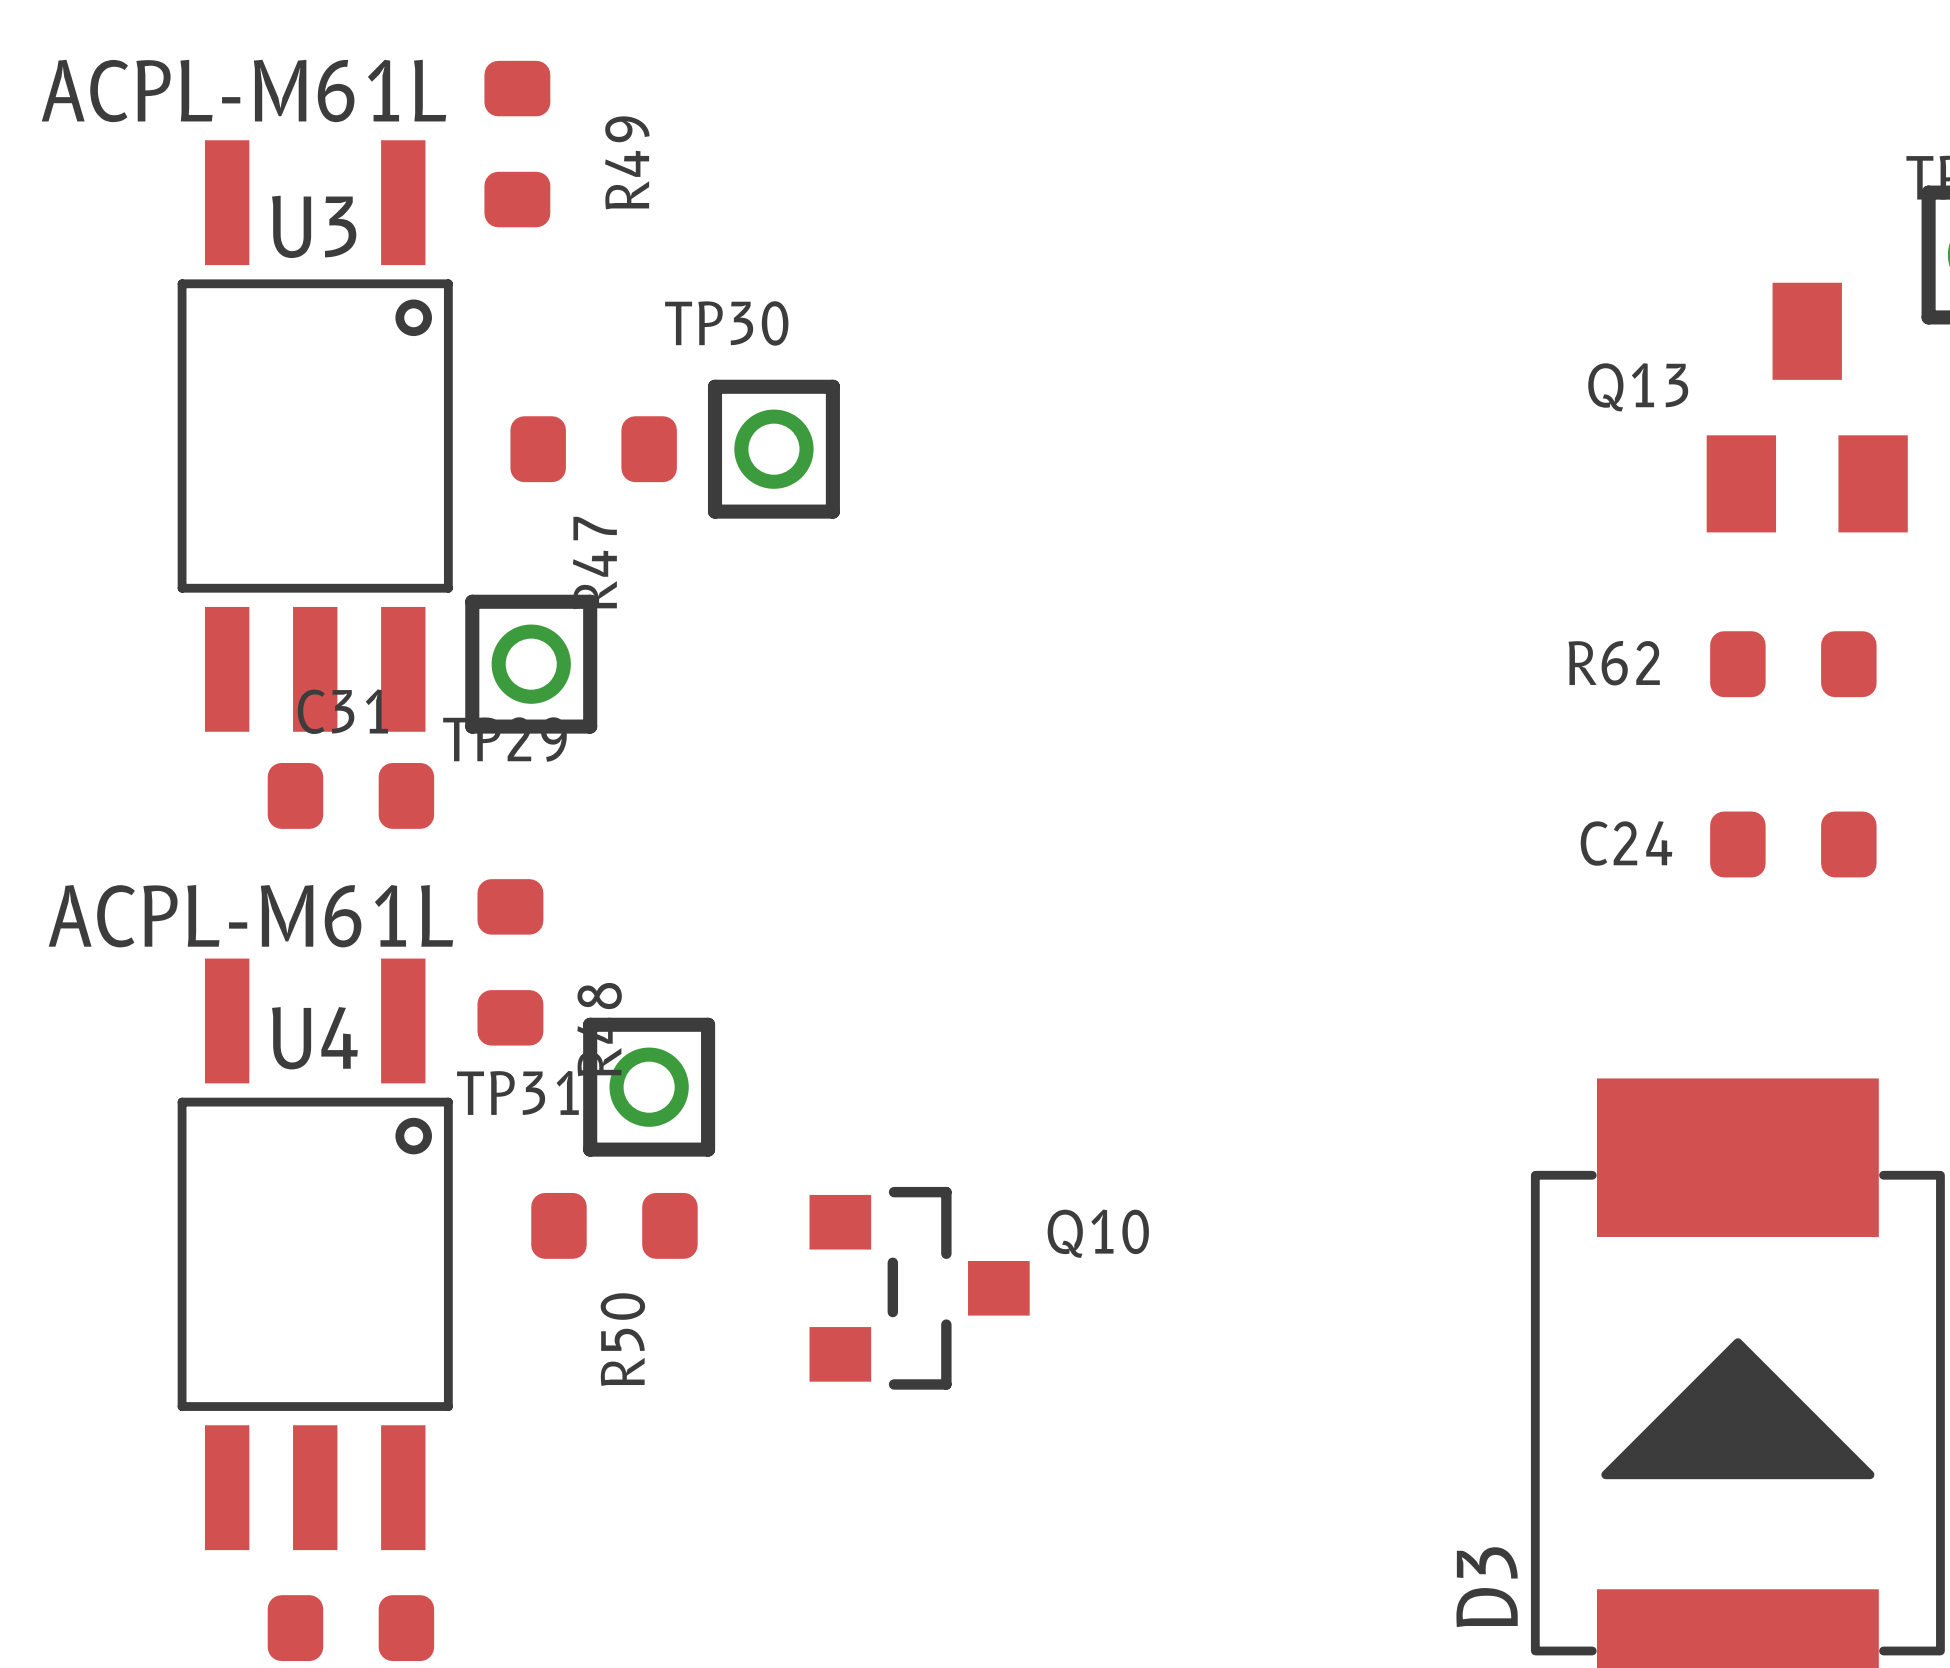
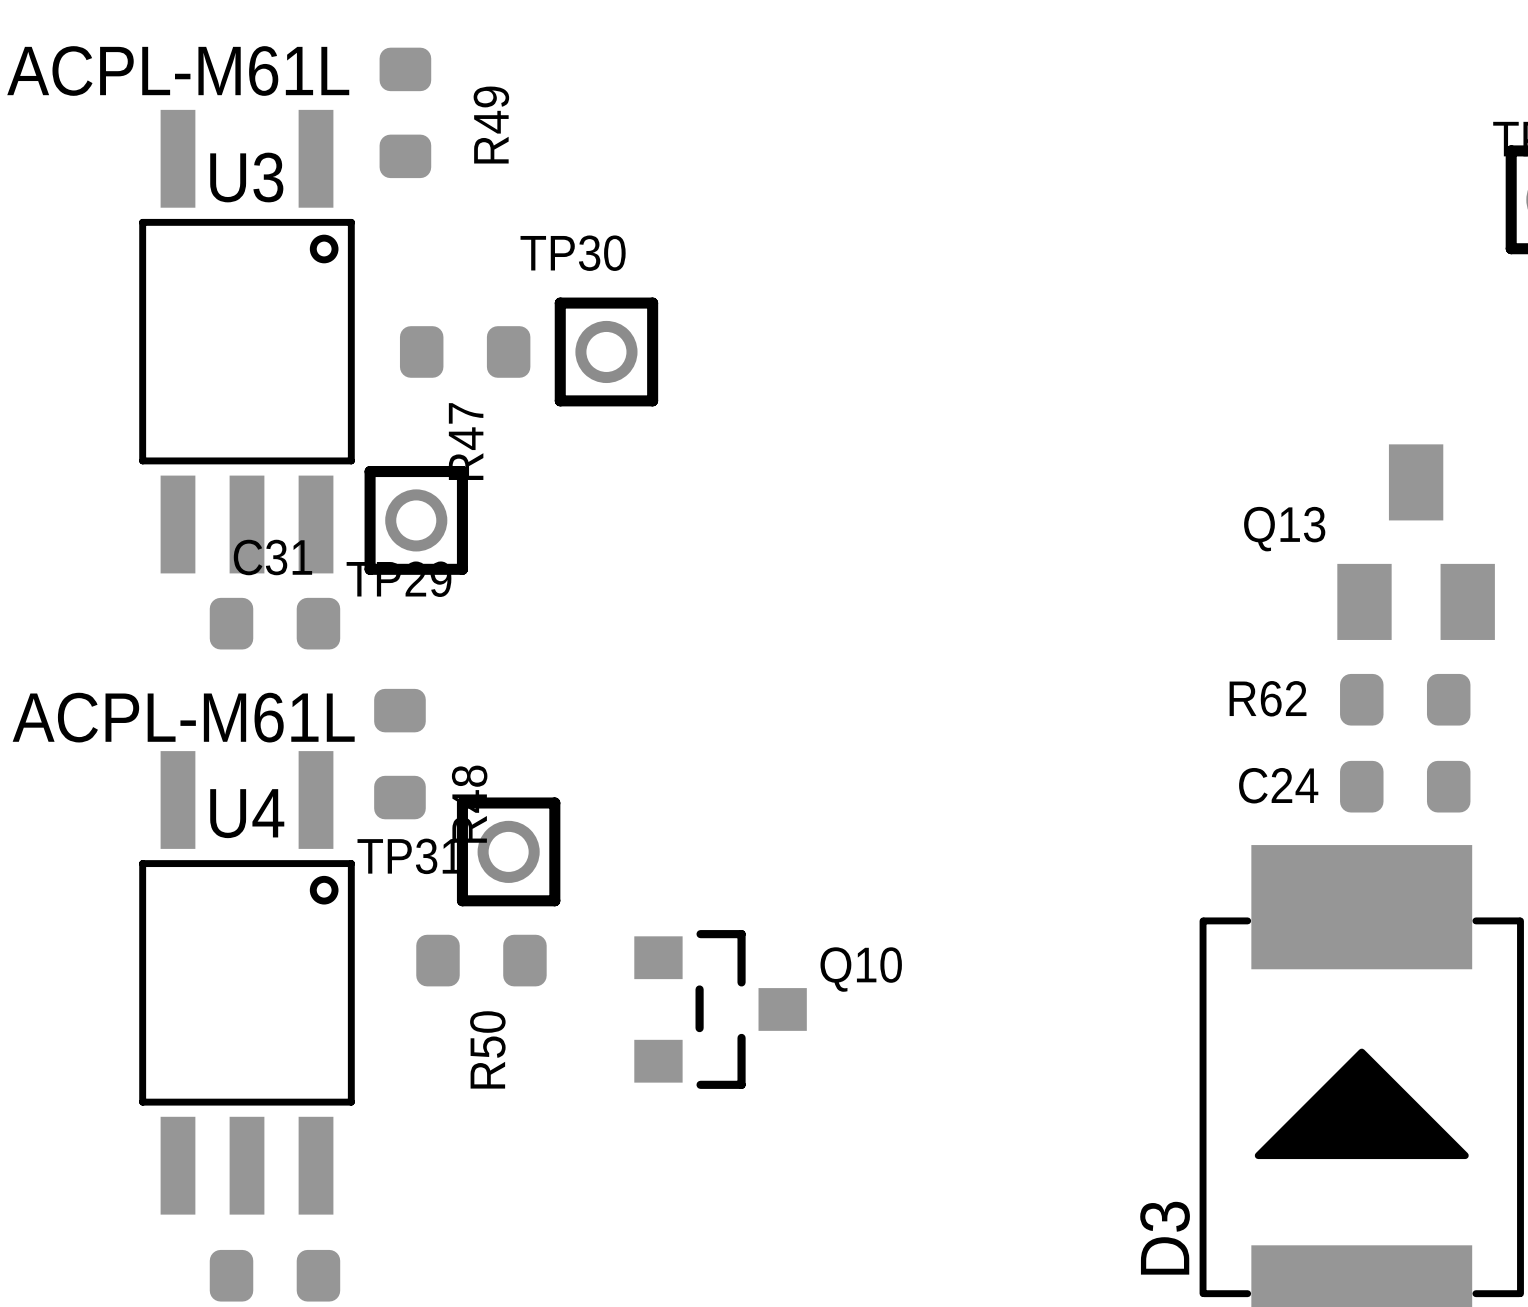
Q13 position: (1807, 407) -> (1416, 542)
R62 position: (1793, 664) -> (1405, 699)
C24 position: (1793, 844) -> (1405, 786)

